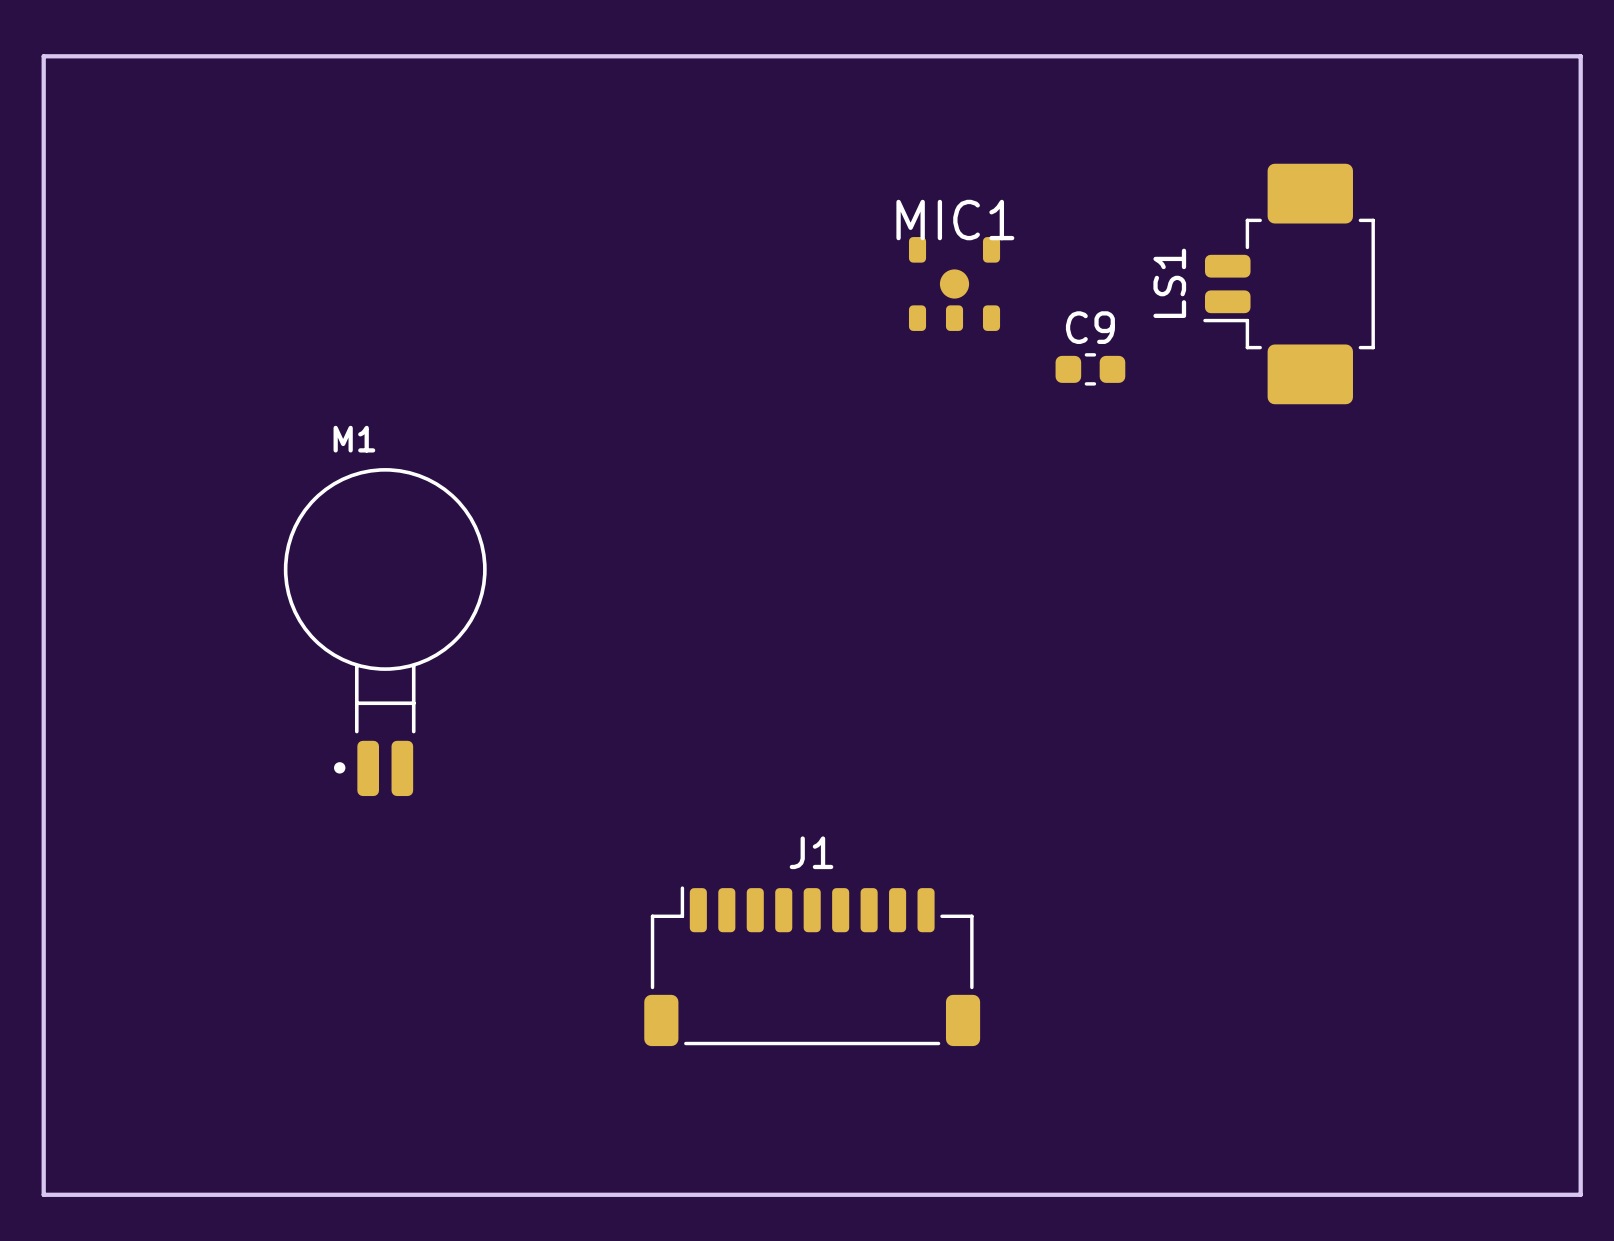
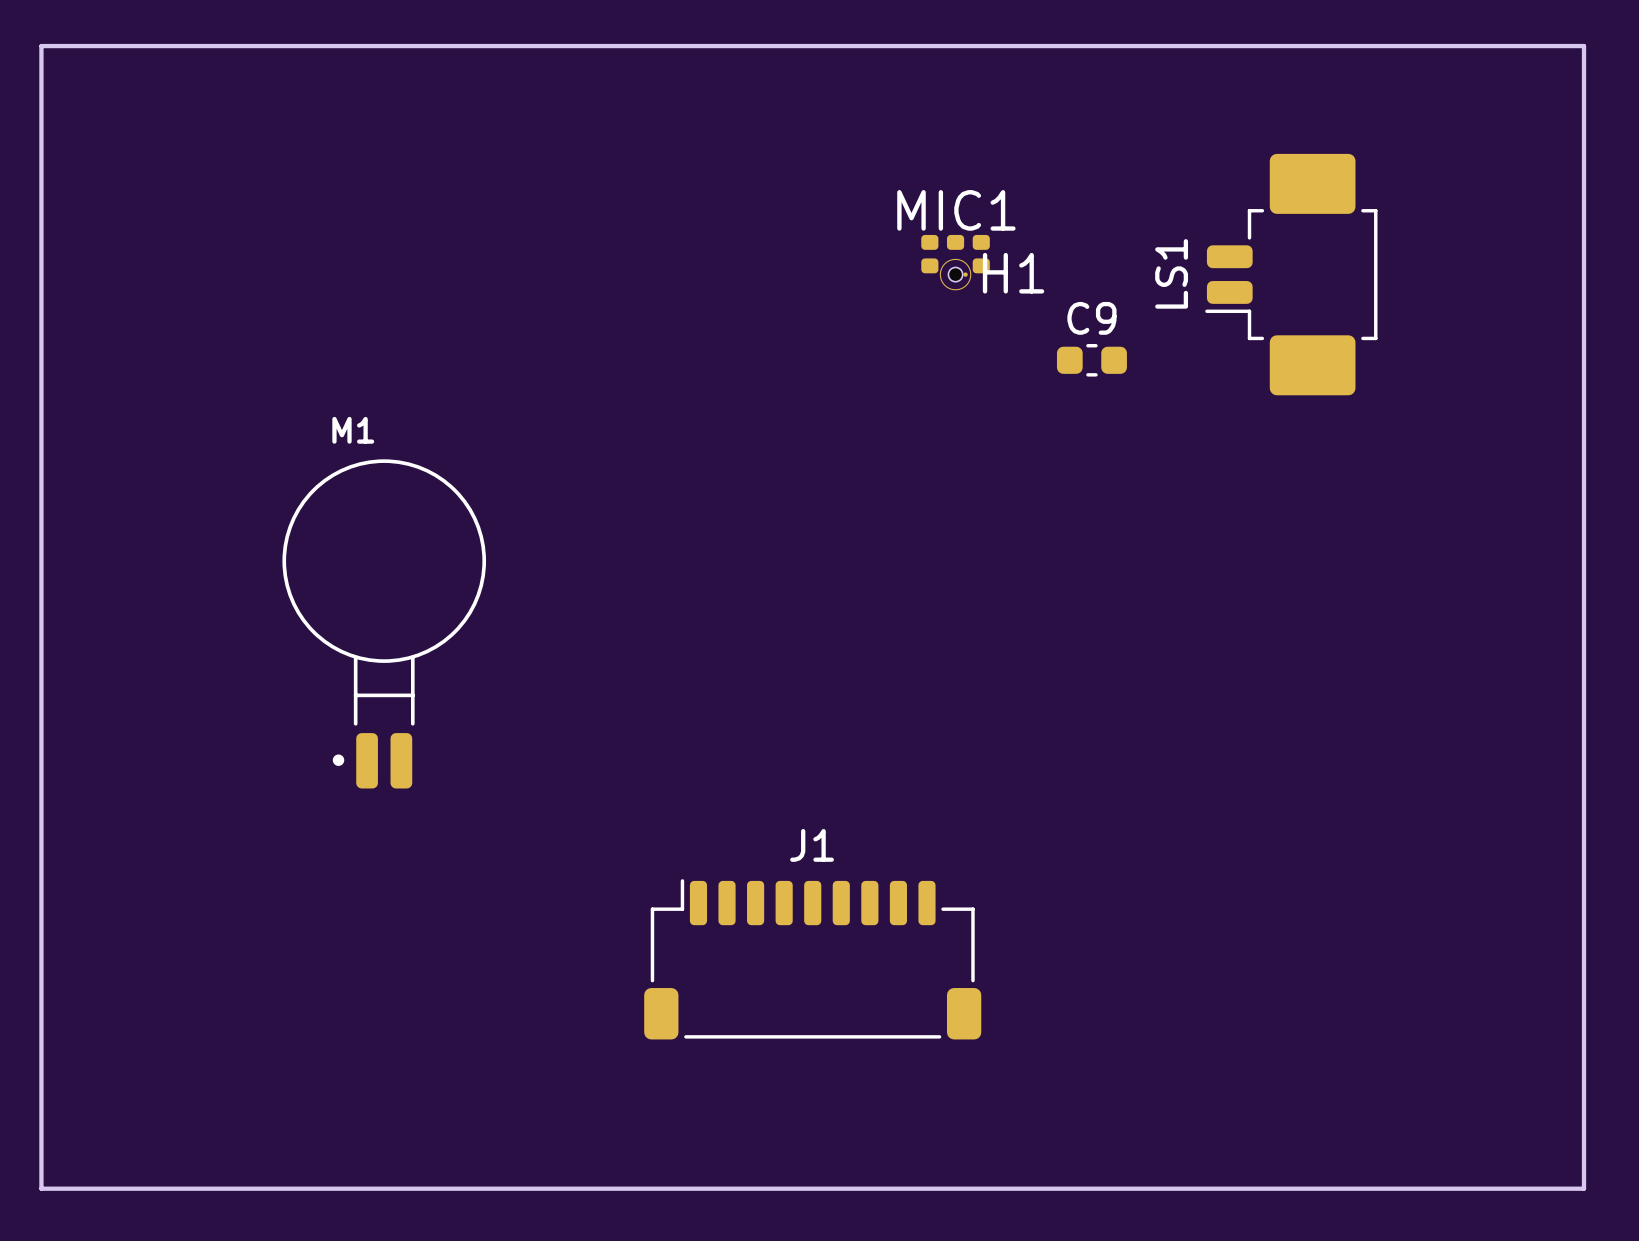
MIC1 footprint: [908, 237, 1001, 331] -> [921, 234, 990, 291]
H1: none -> (955, 274)

